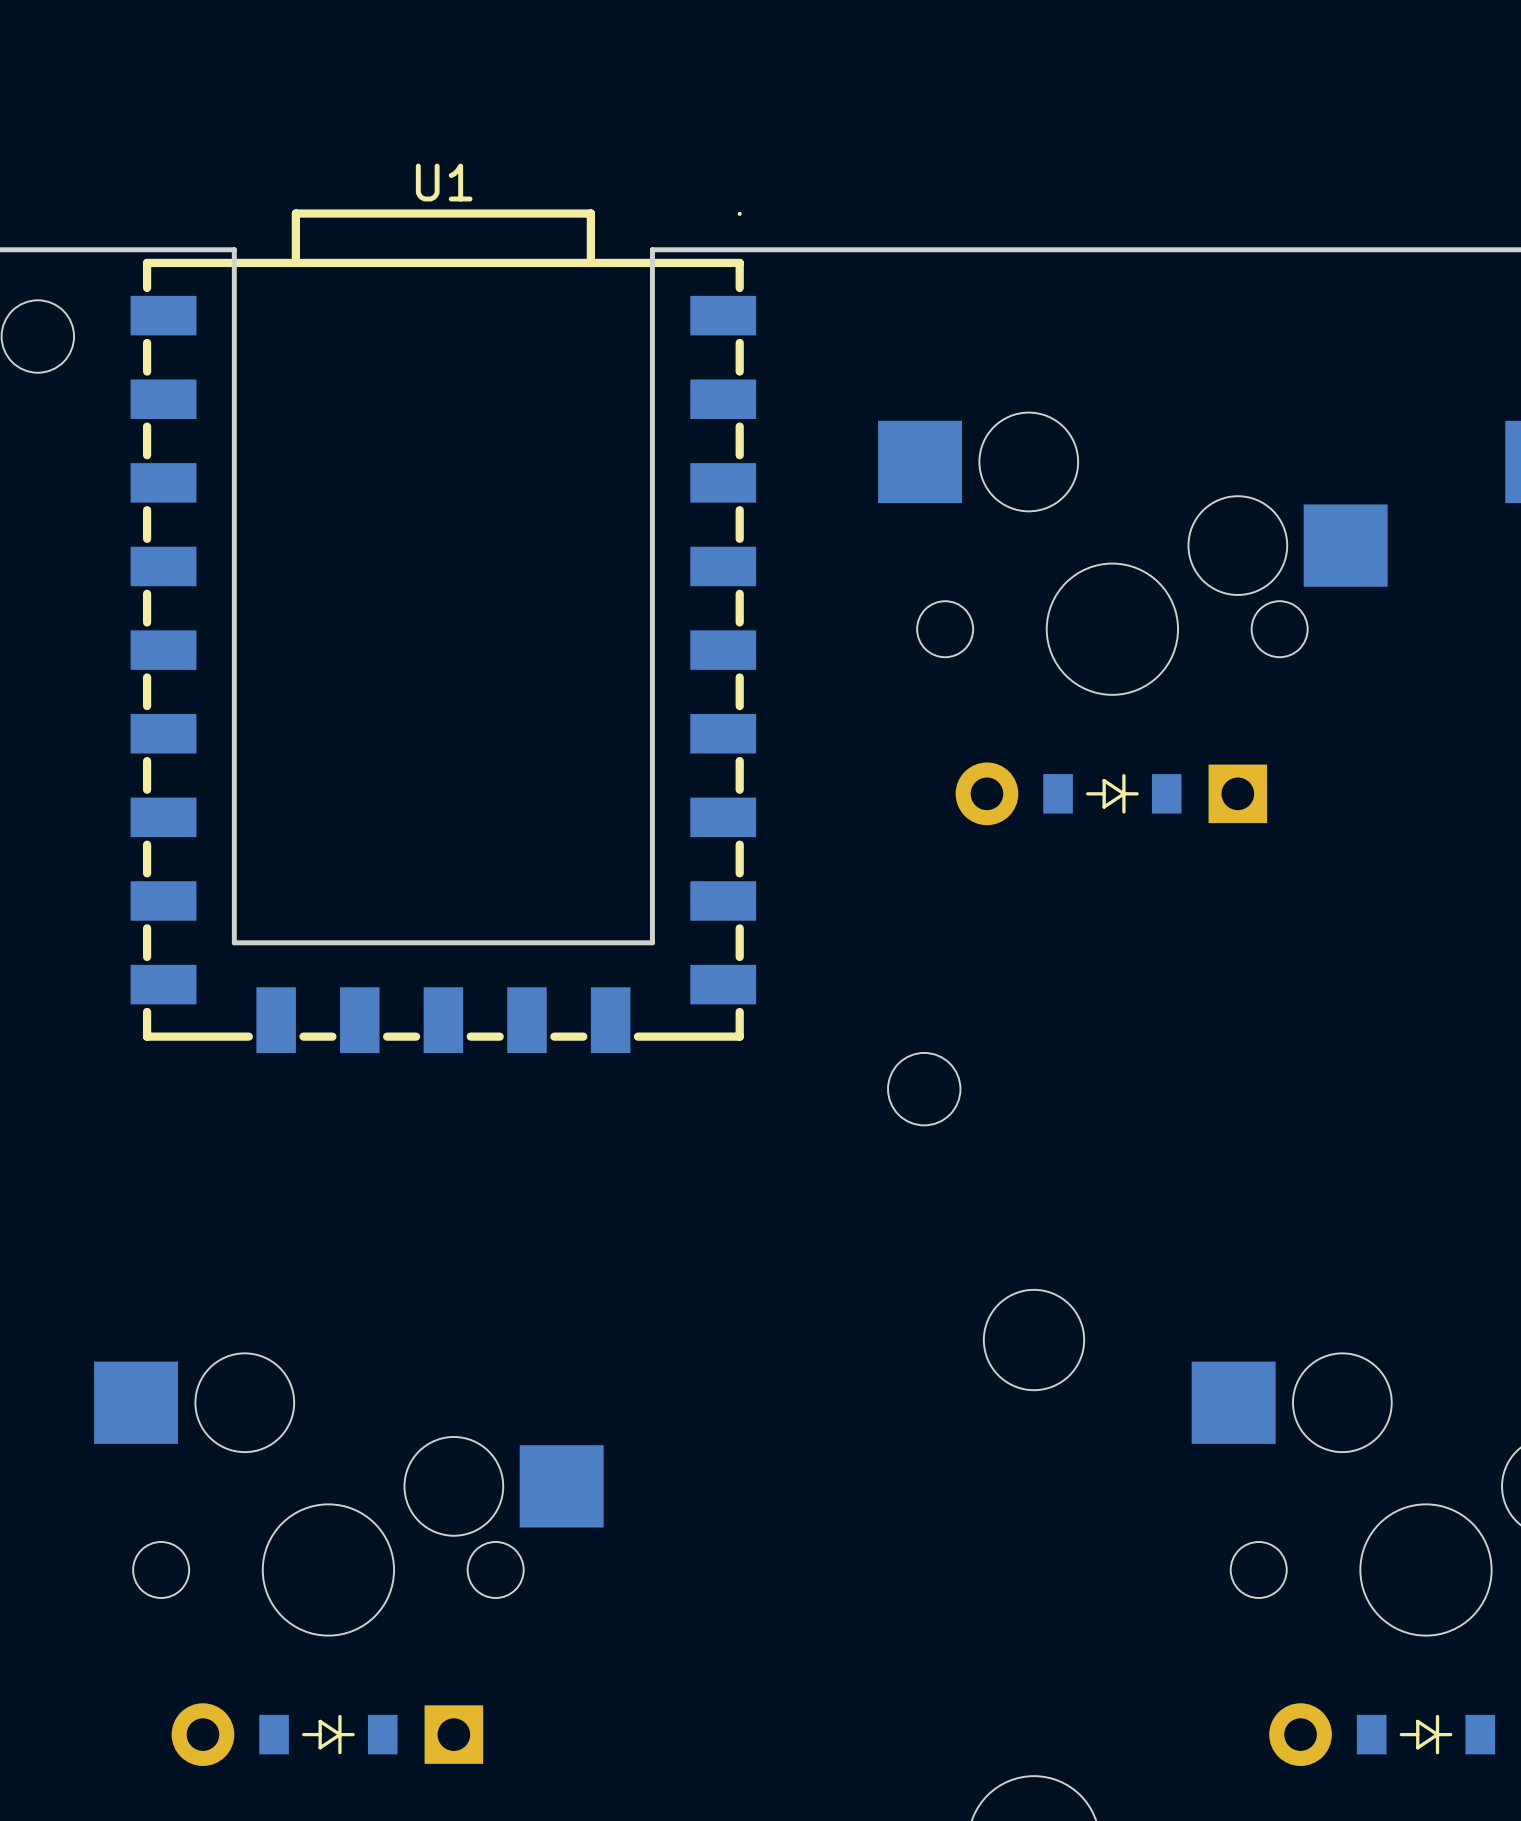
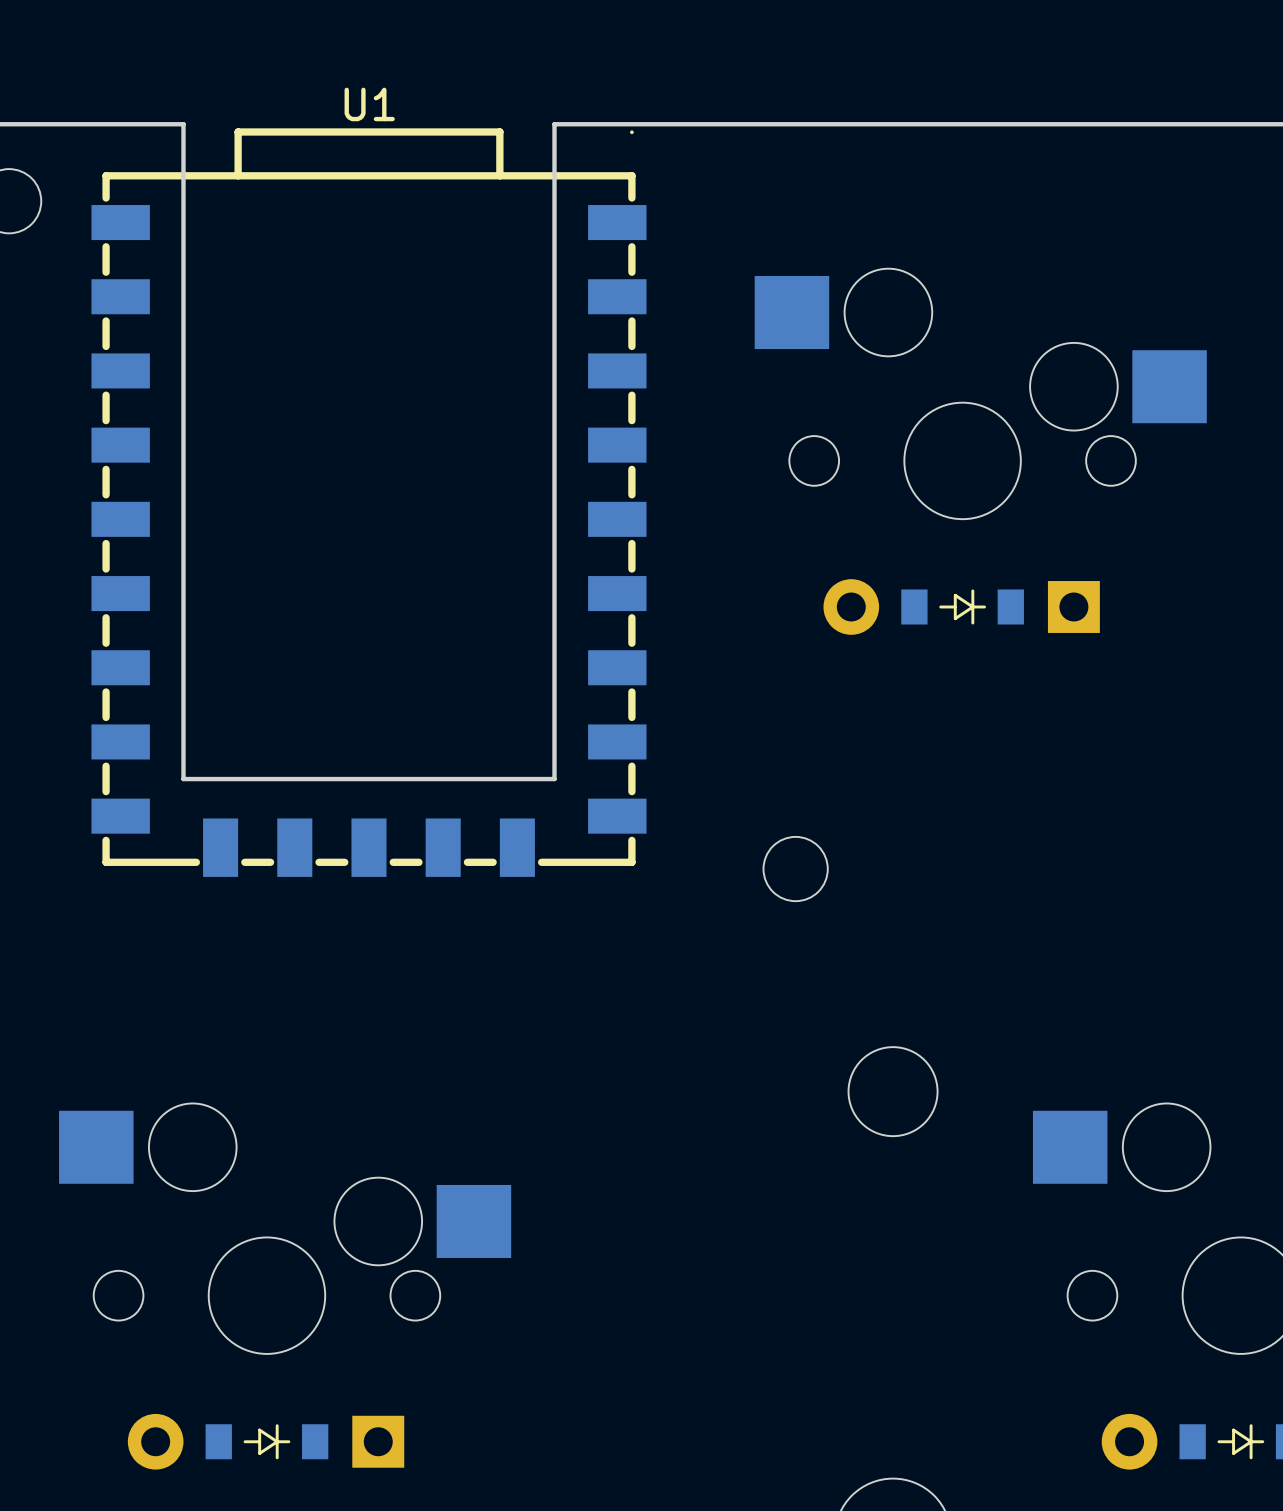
U1 position: (443, 631) -> (368, 502)
board edge: (652, 942) (234, 942) -> (554, 739) (554, 779) (183, 779) (183, 739)

